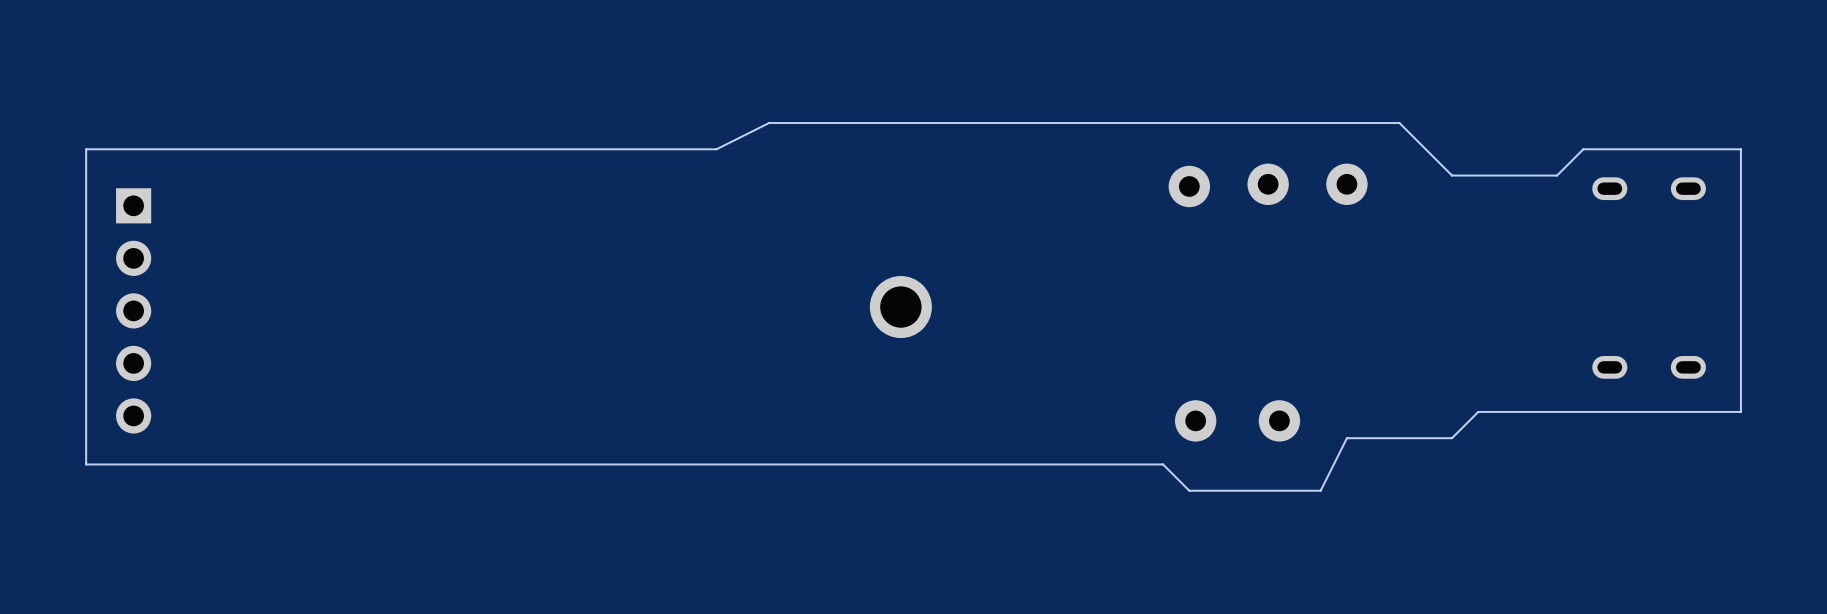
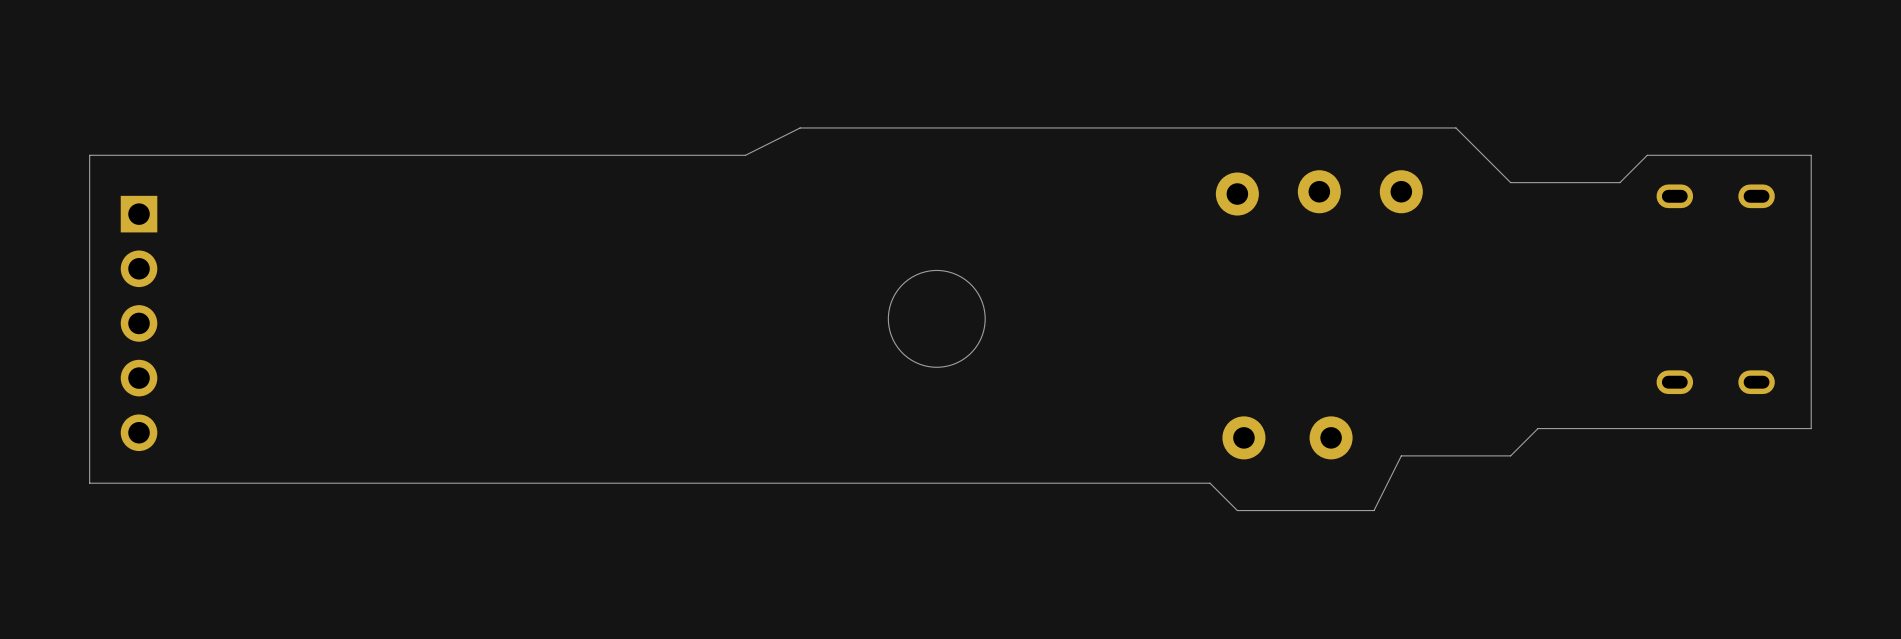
round board edge: none -> [887, 269, 986, 368]
part: (900, 307) -> none

